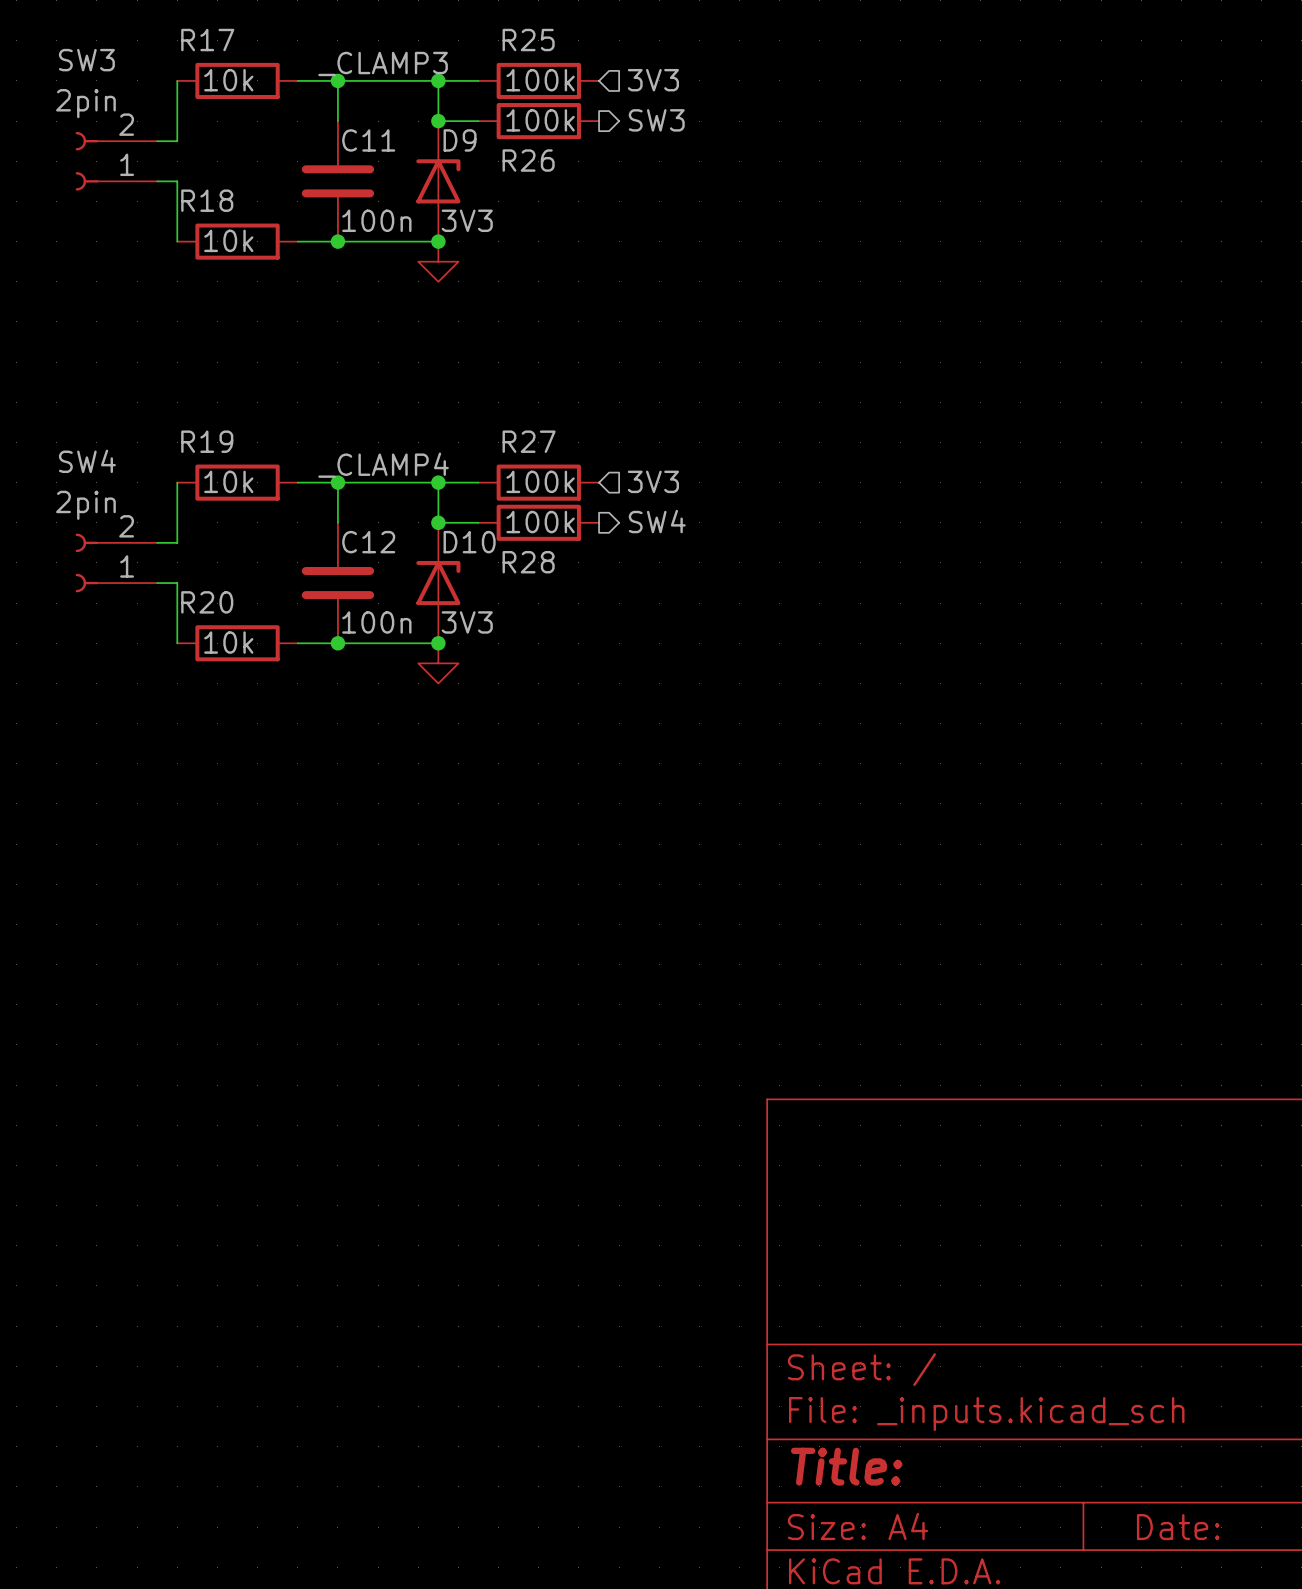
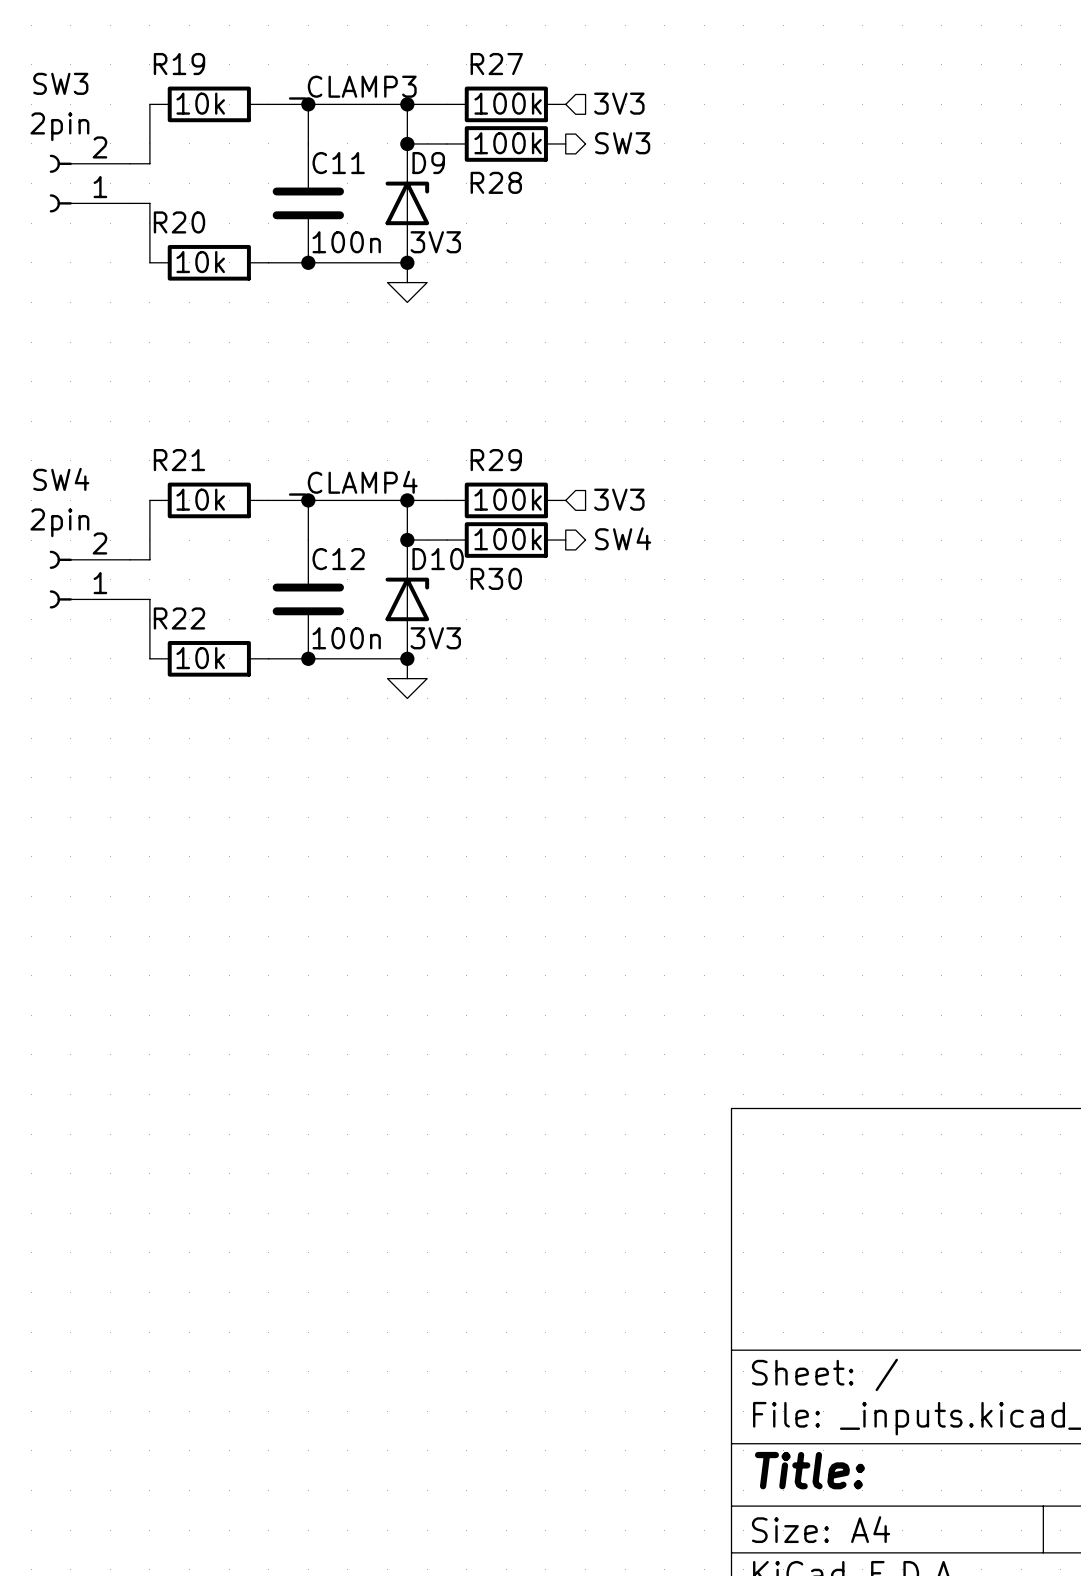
R17 name: R17 (207, 40) -> R19 (179, 64)
R25 name: R25 (528, 40) -> R27 (496, 64)
R26 name: R26 (528, 160) -> R28 (496, 182)
R18 name: R18 (207, 200) -> R20 (179, 222)
R19 name: R19 (207, 441) -> R21 (179, 460)
R27 name: R27 (529, 441) -> R29 (496, 460)
R28 name: R28 (528, 562) -> R30 (496, 578)
R20 name: R20 (207, 602) -> R22 (179, 618)

